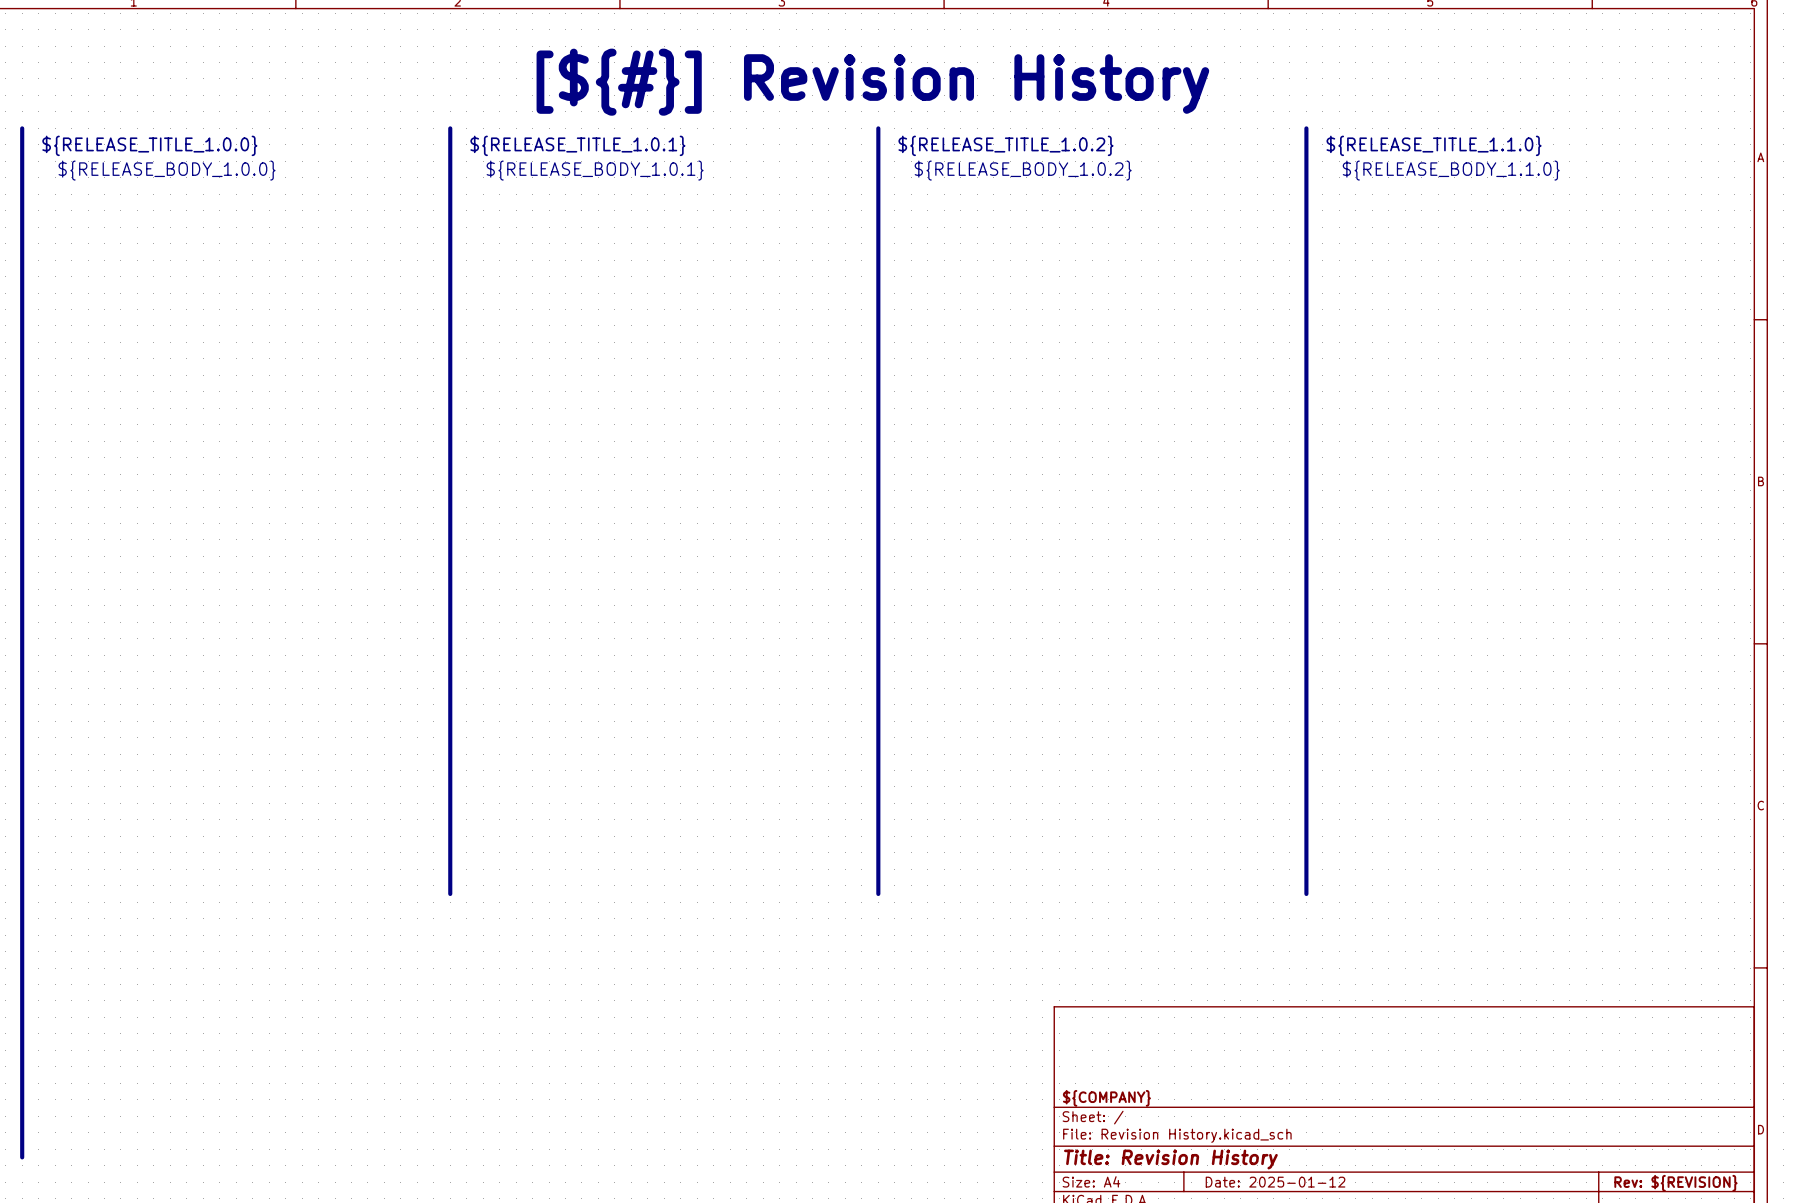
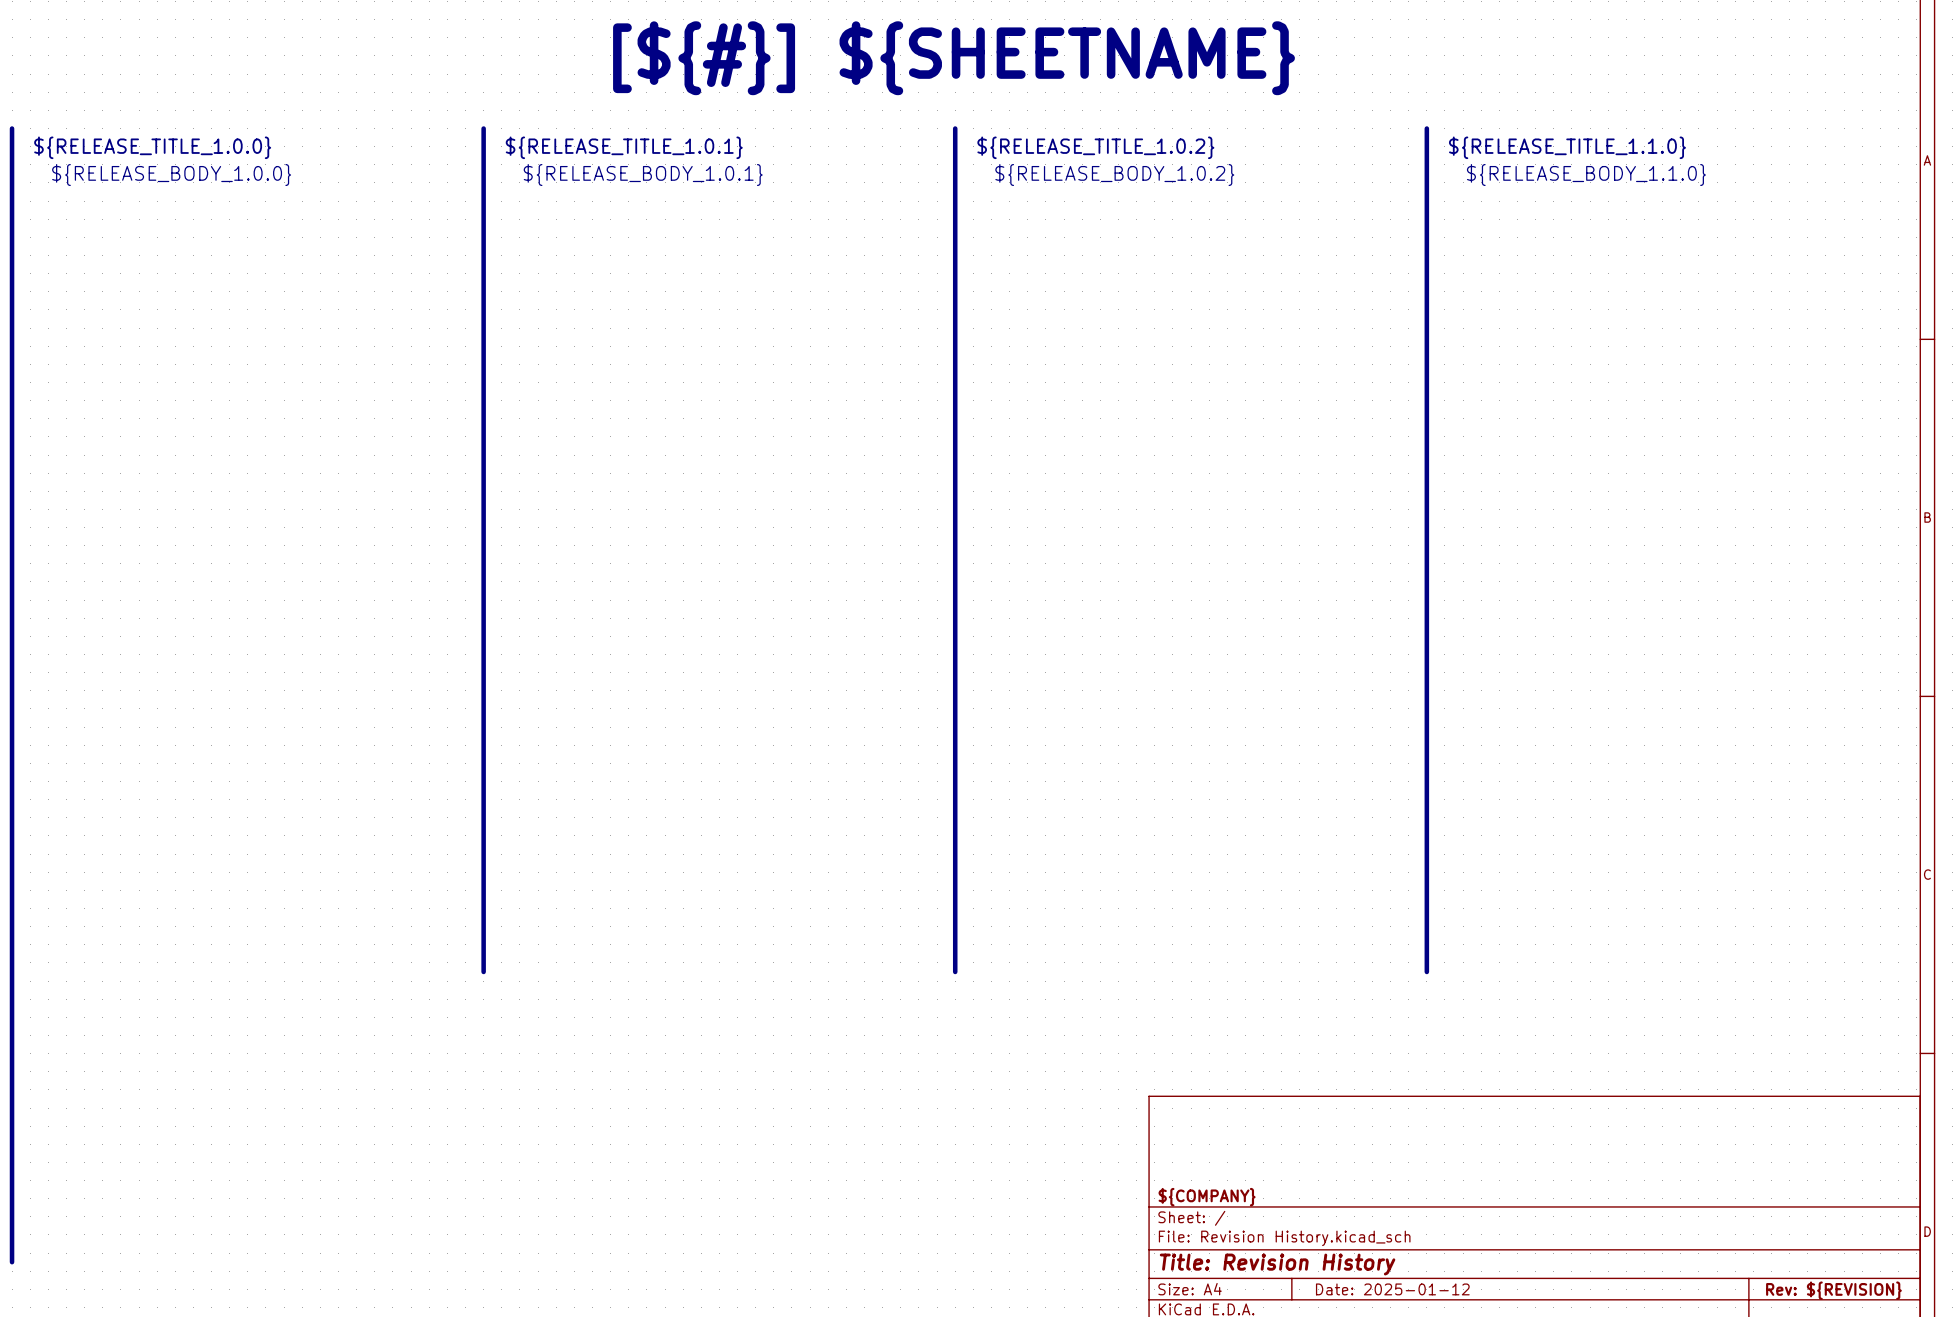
text: none -> [${#}] ${SHEETNAME} (954, 58)
text: [${#}] Revision History (872, 82) -> none

